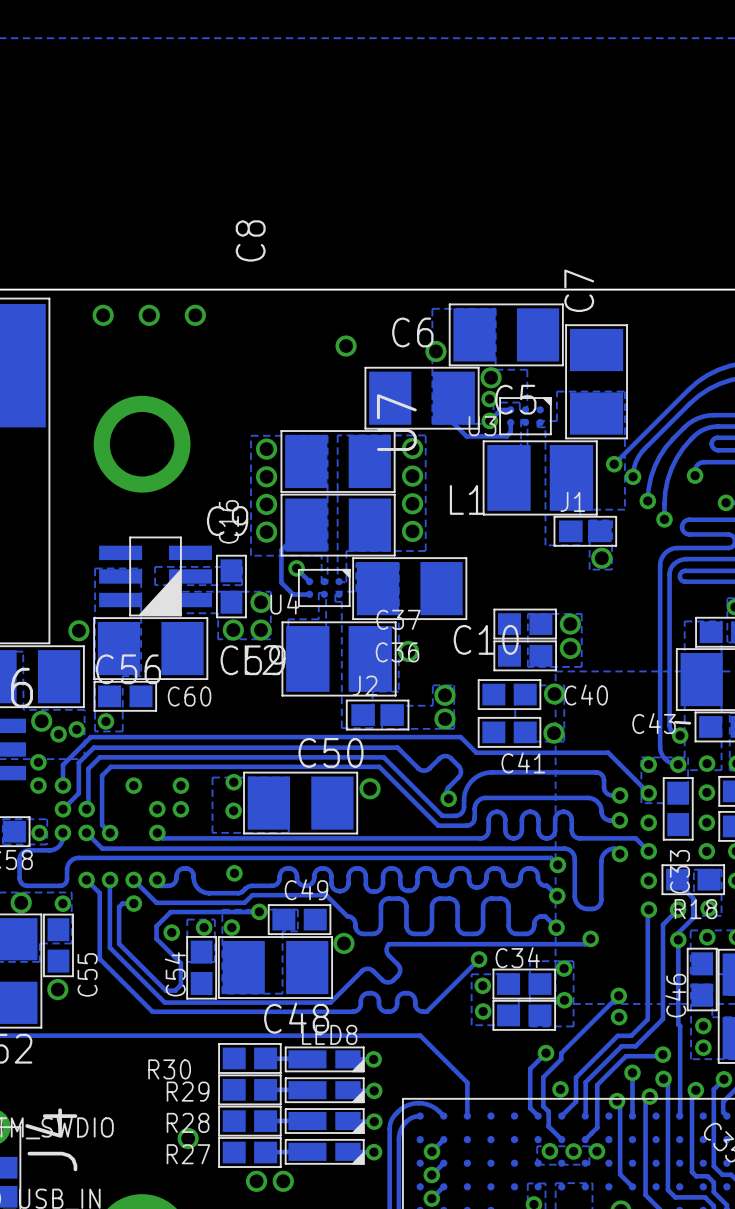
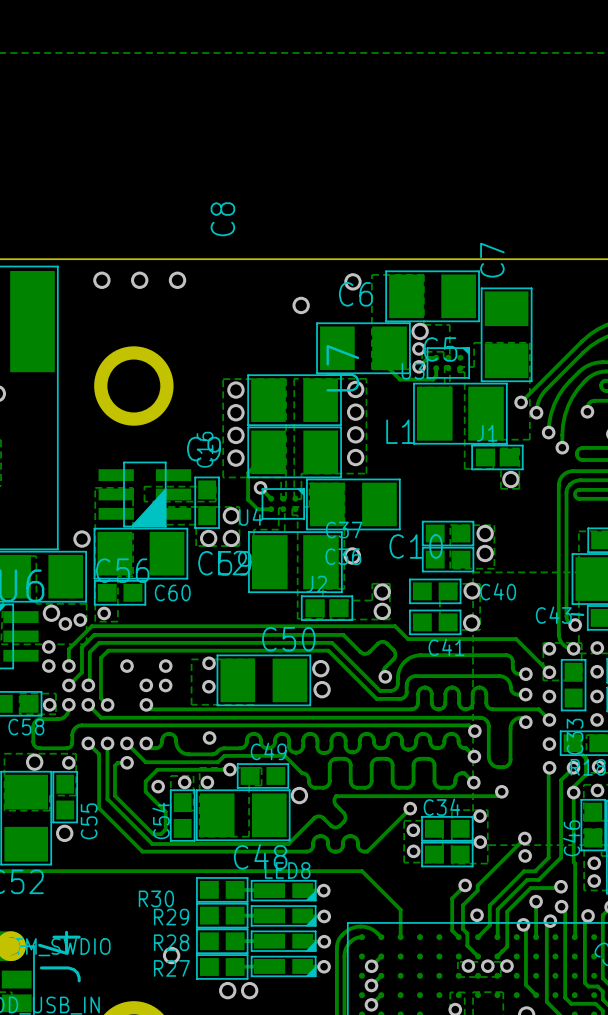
via position: (435, 351) -> (352, 281)
via: none -> (322, 689)

